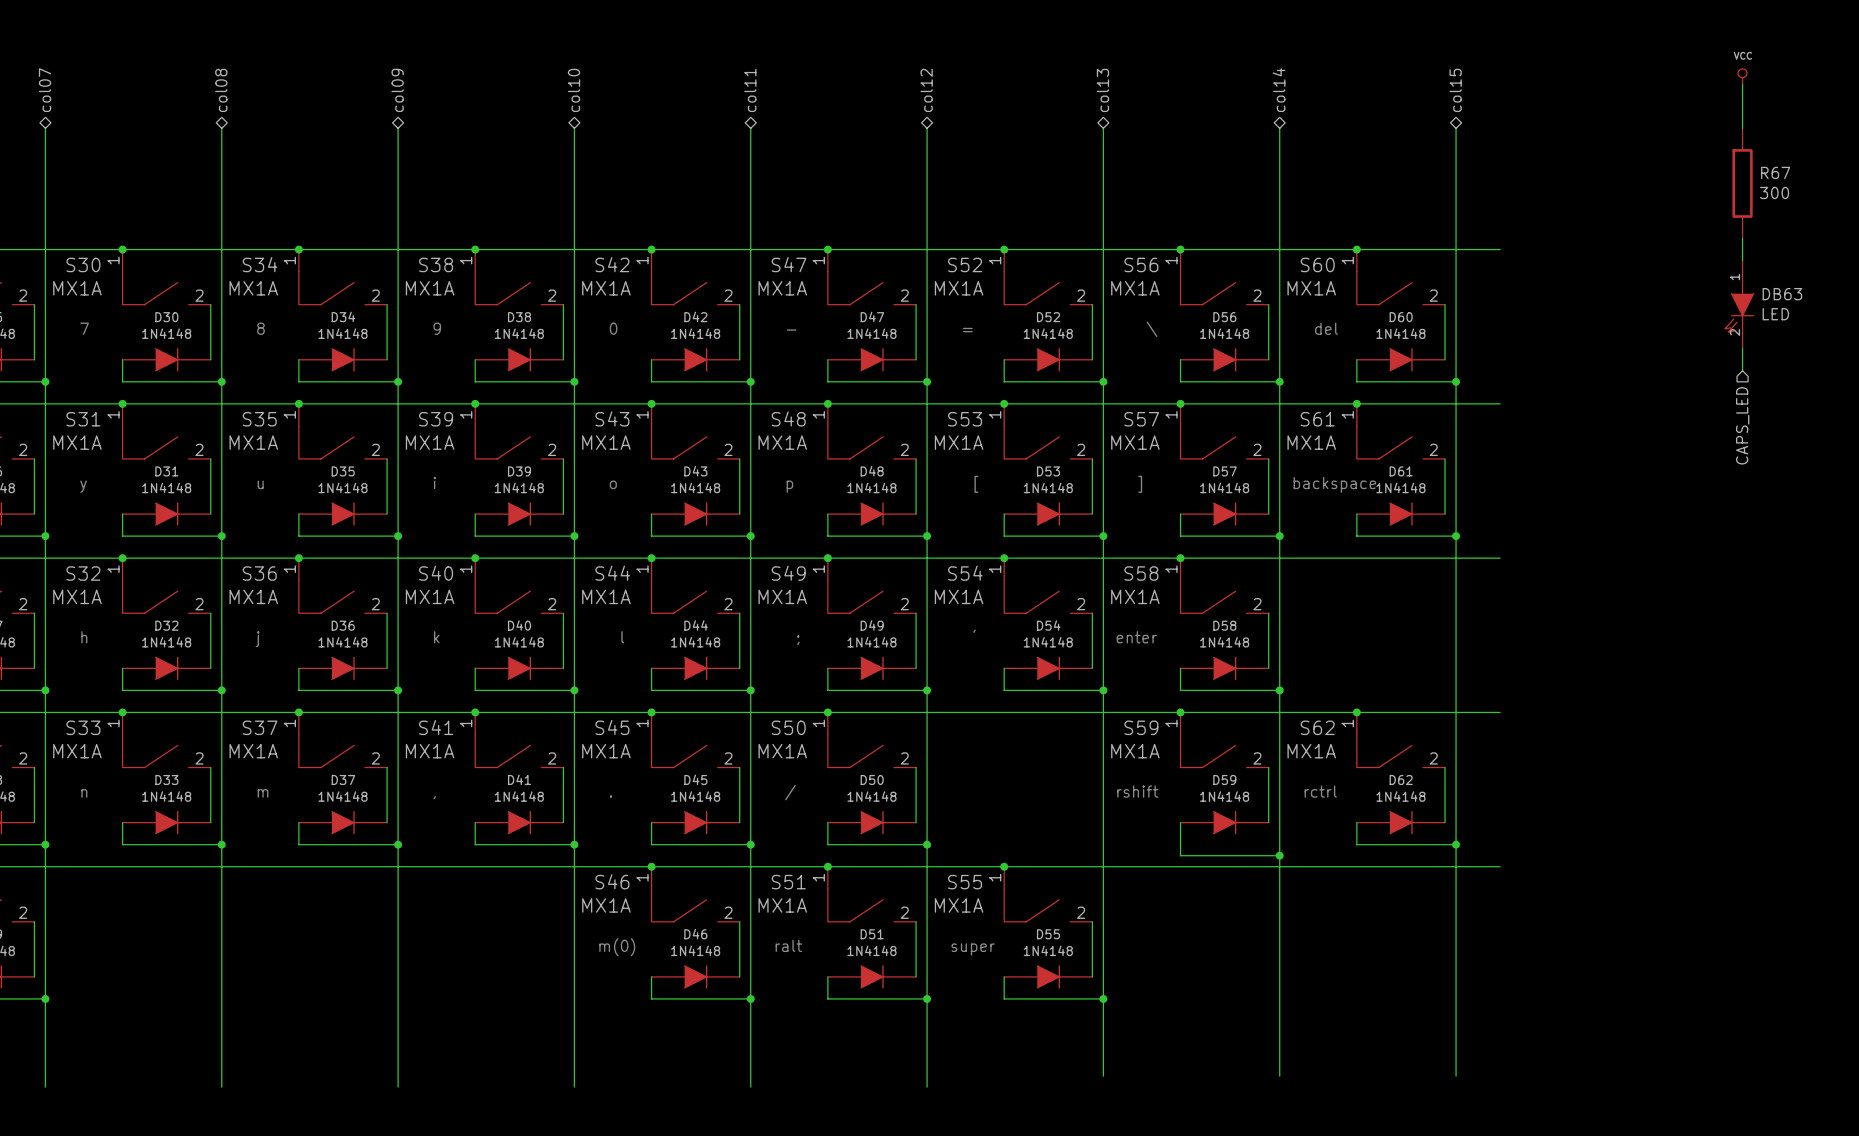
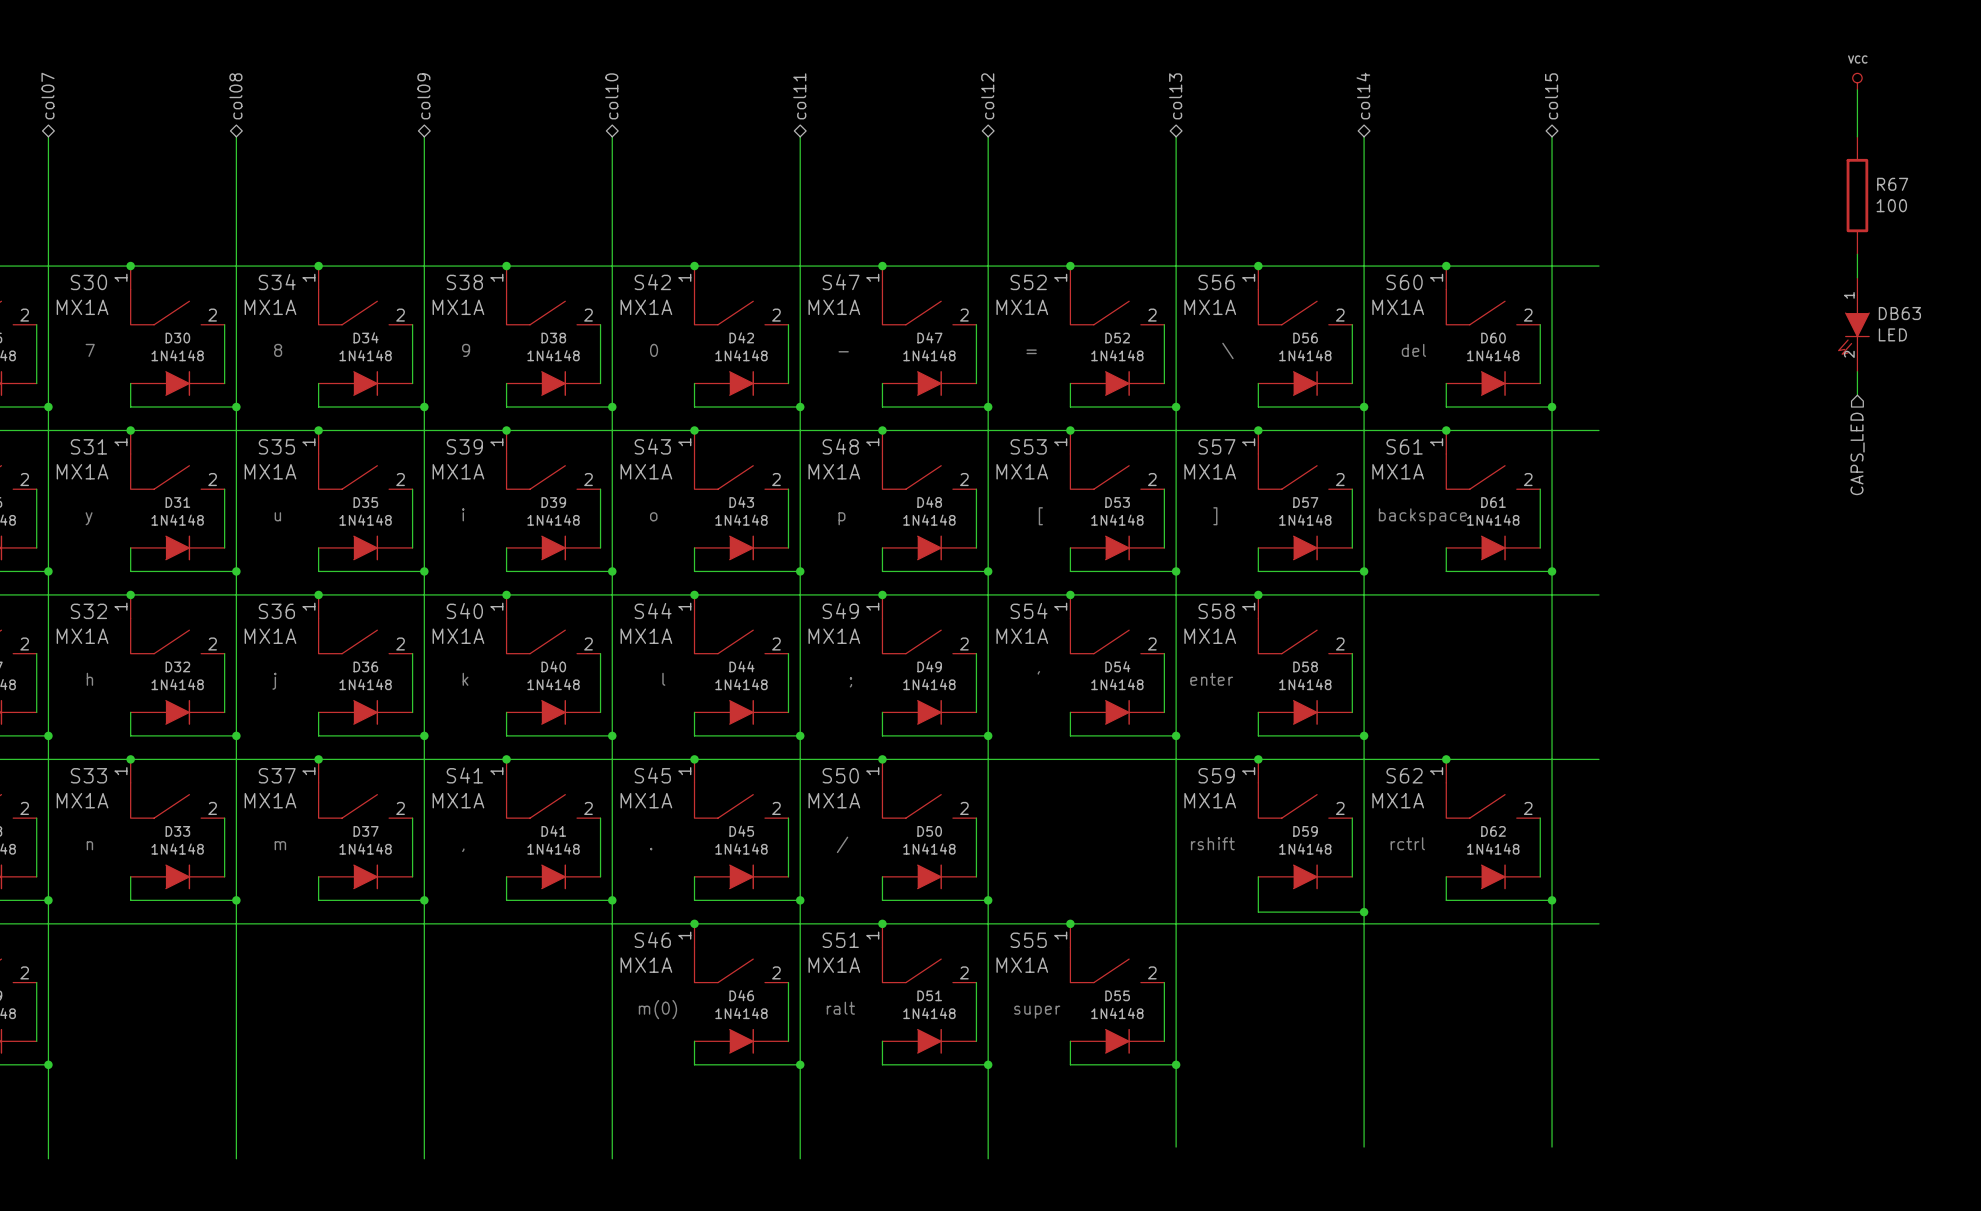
R67 value: 300 (1774, 192) -> 100 (1891, 205)

